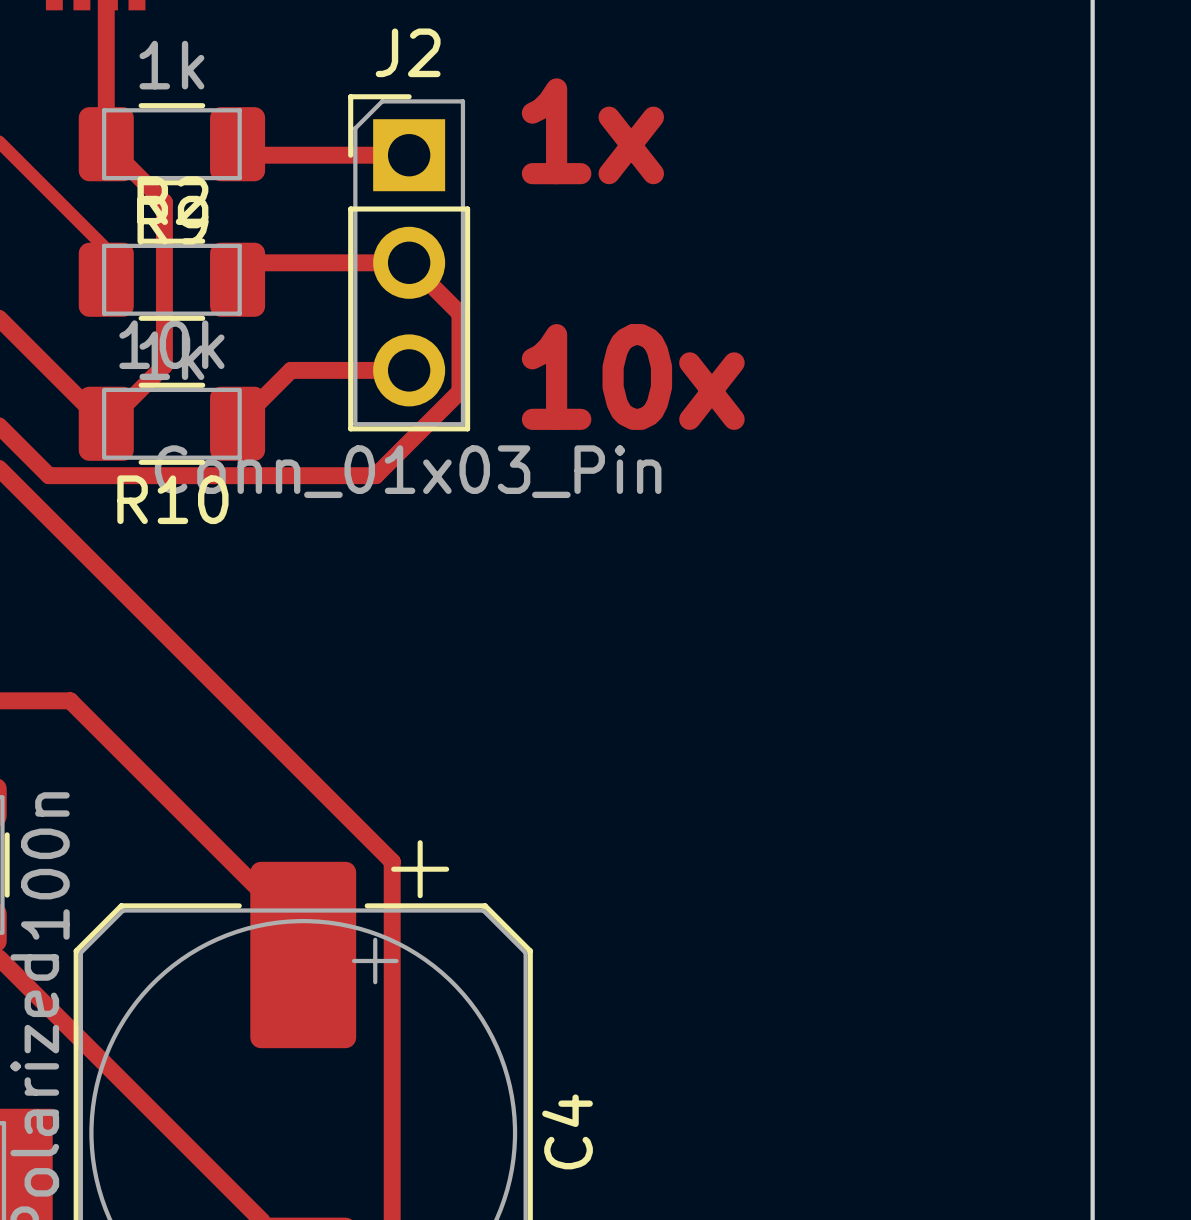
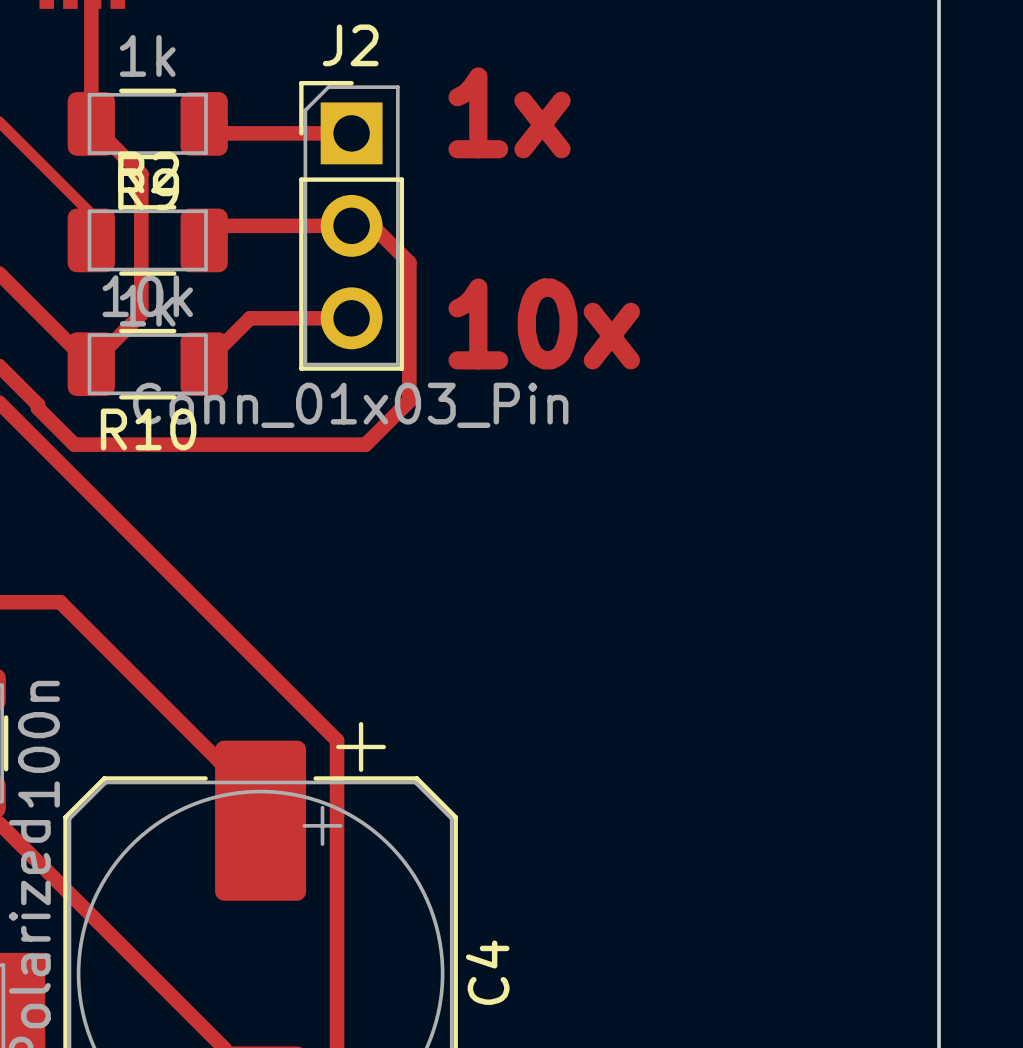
top track: (409, 262) (459, 313) (459, 391) (375, 475) (48, 475) (44, 471) -> (351, 225) (372, 225) (409, 262) (409, 400) (365, 444) (74, 444) (38, 408) (38, 404)

